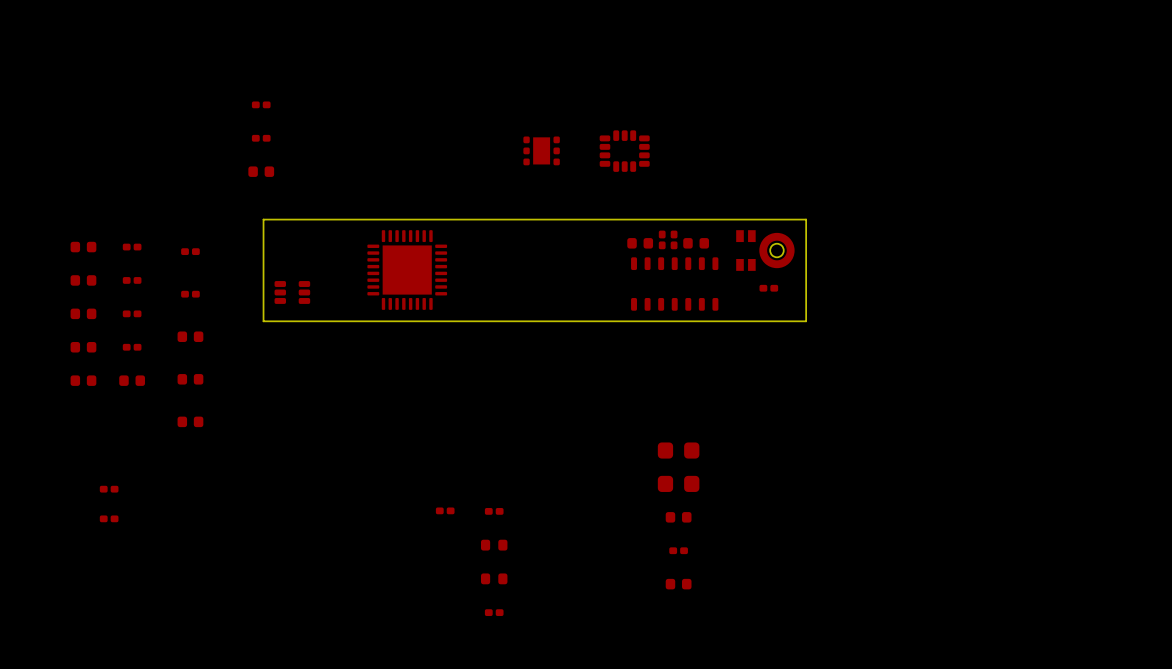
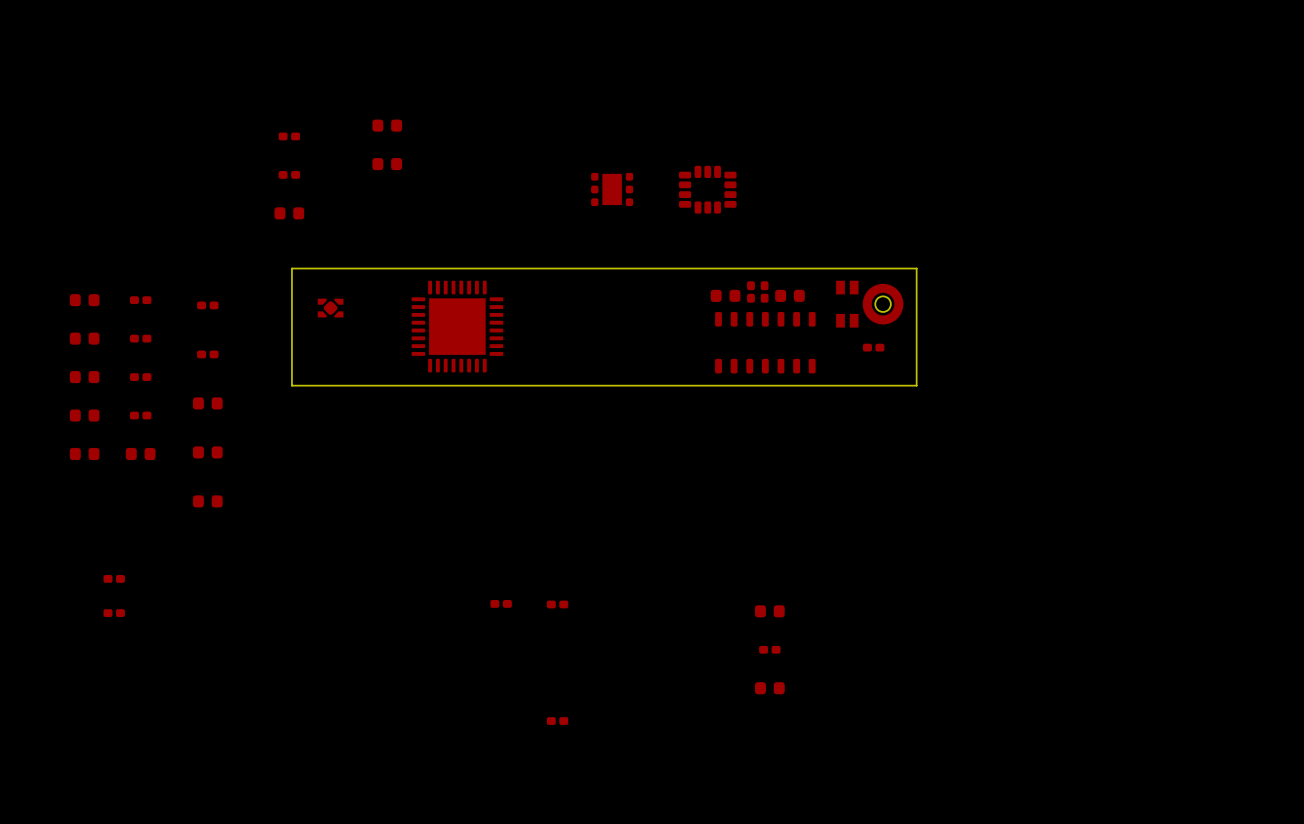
part: none -> (387, 125)
part: none -> (387, 164)
part: none -> (330, 308)
part: (292, 292) -> none
part: (678, 450) -> none
part: (678, 483) -> none
part: (494, 545) -> none
part: (494, 578) -> none

